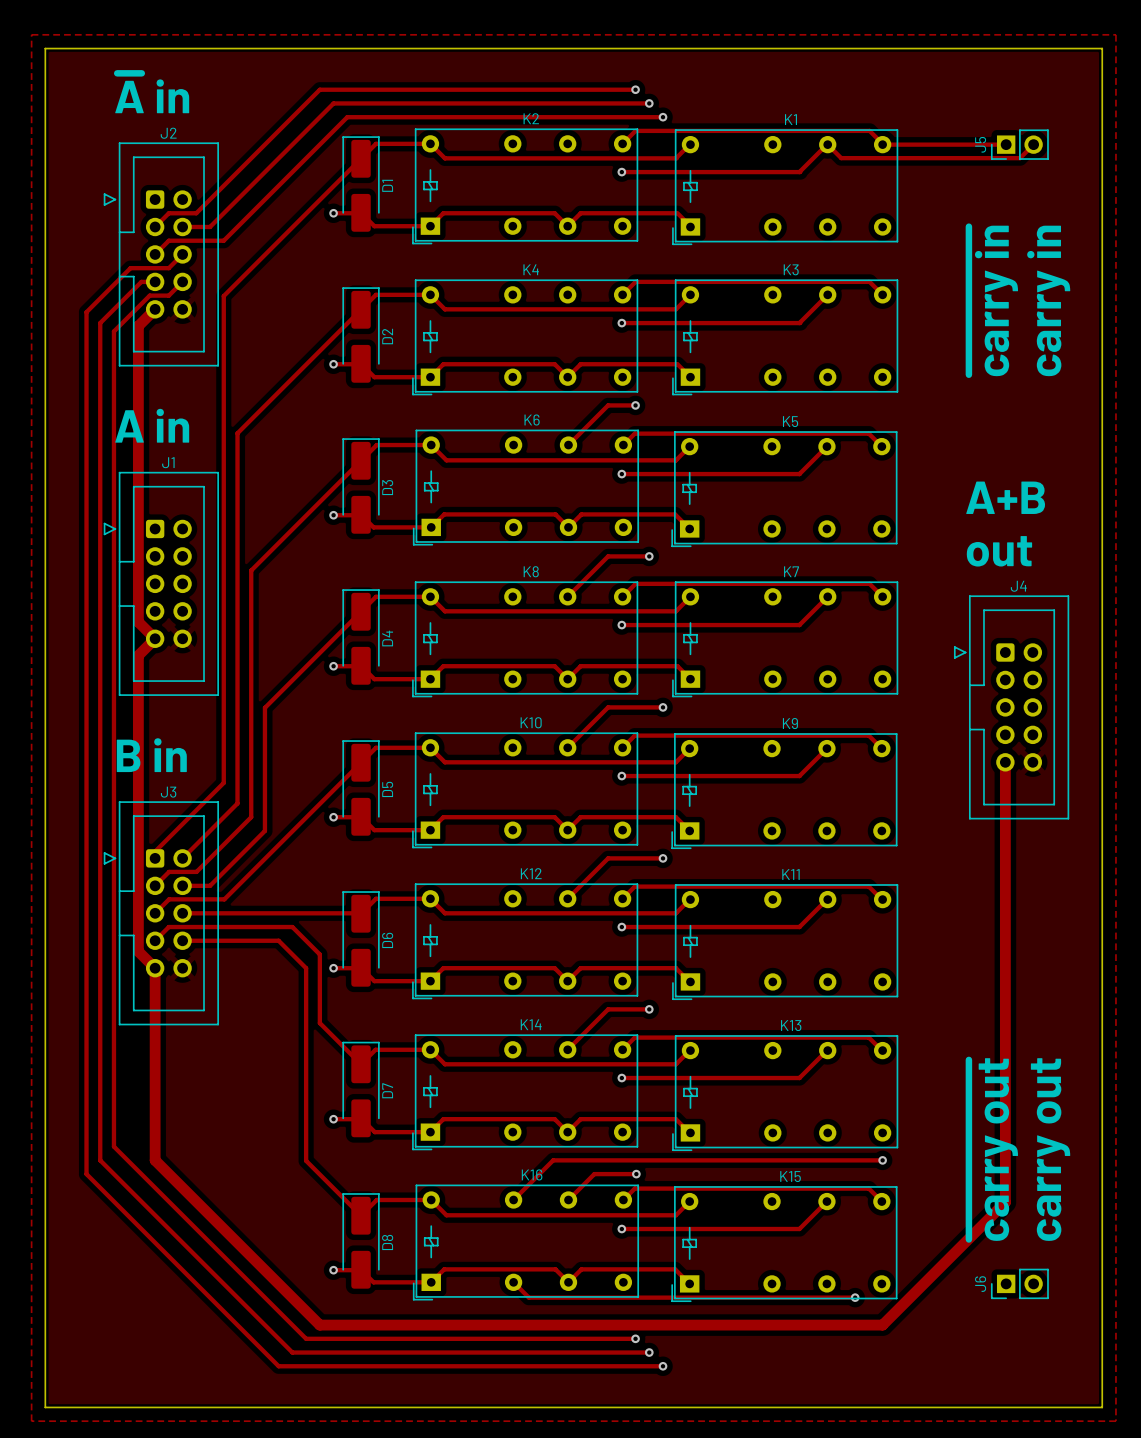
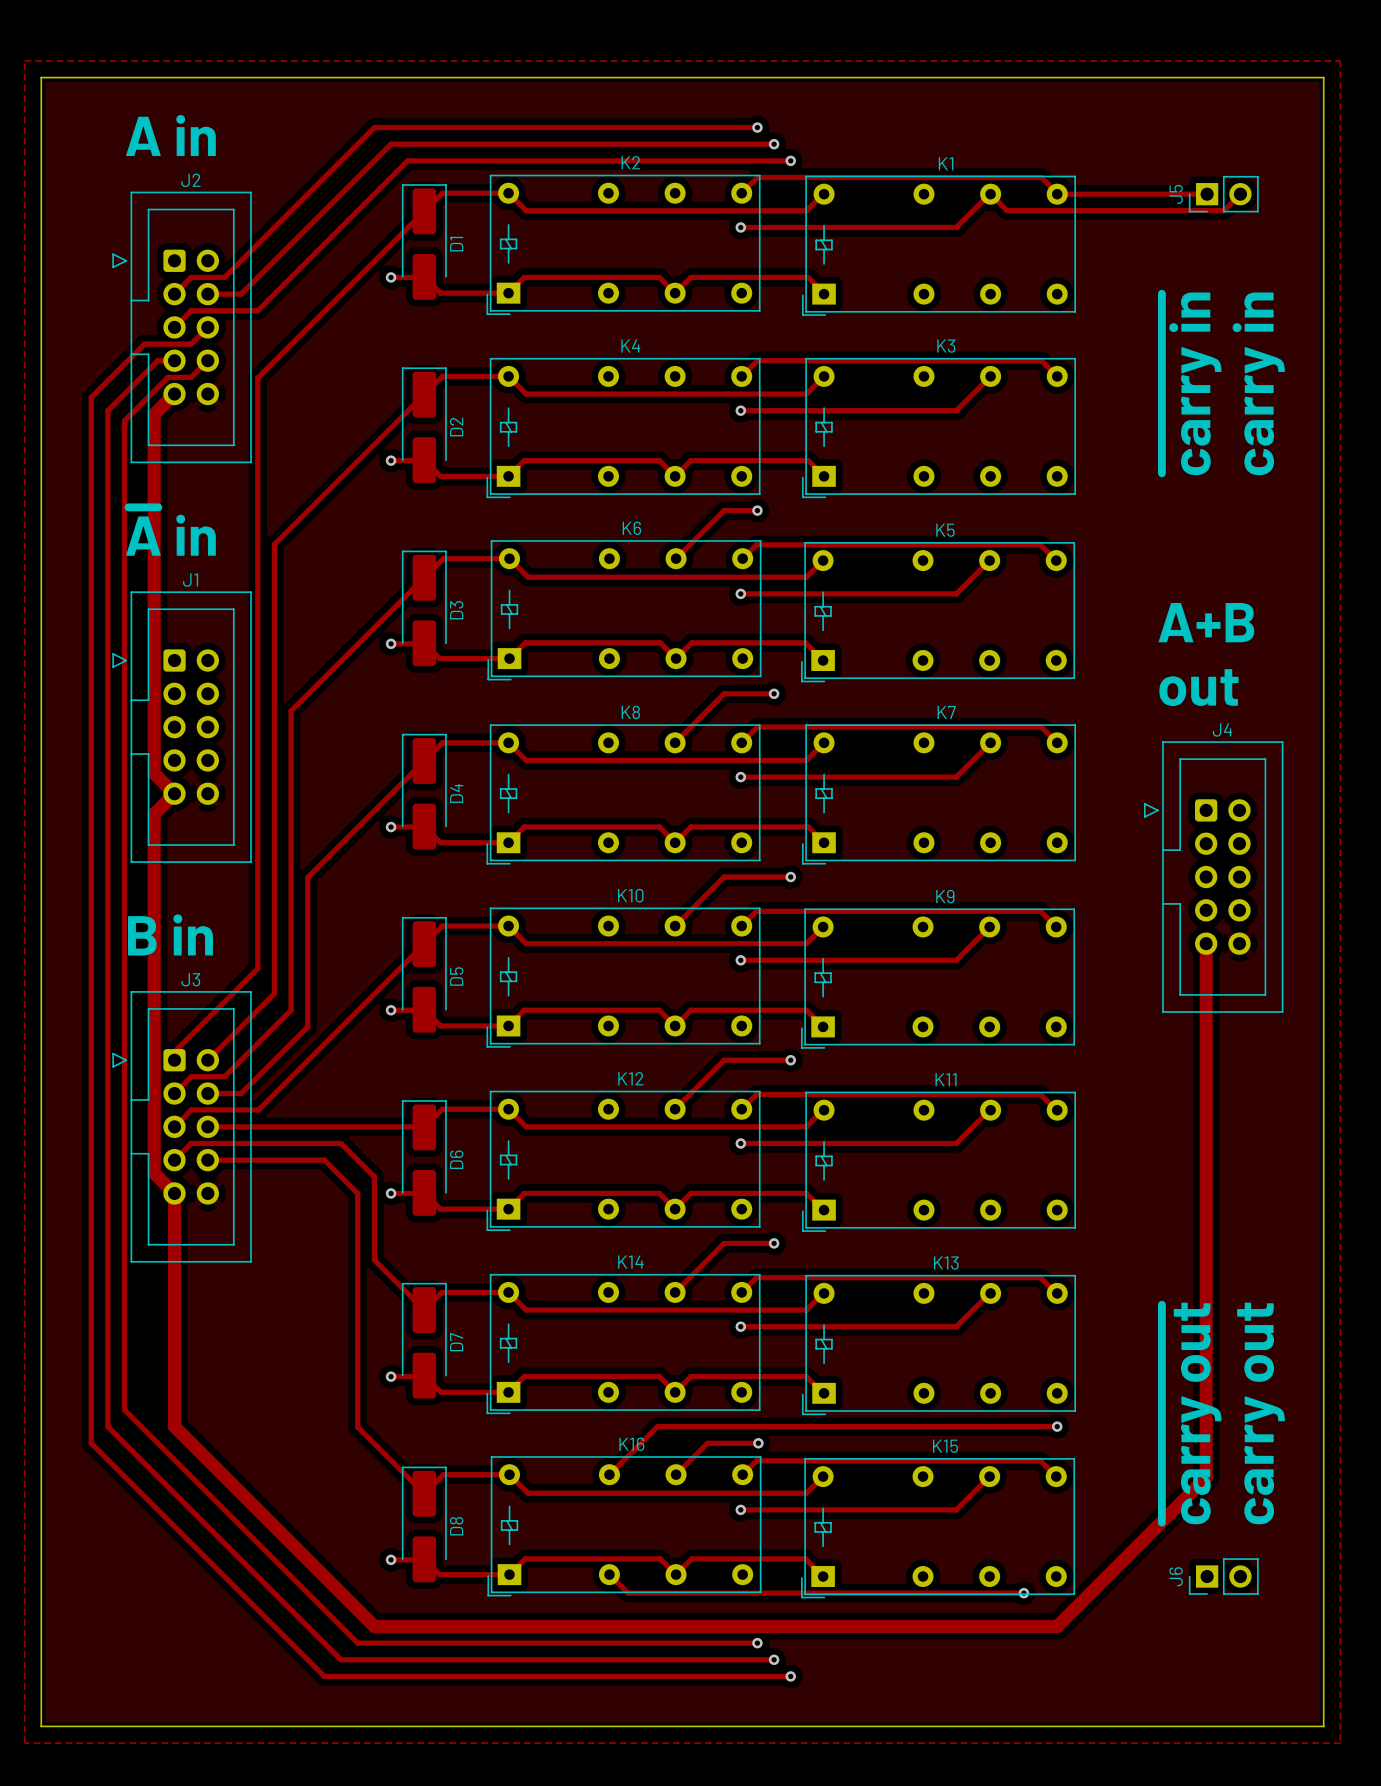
text: ~{A} in (152, 93) -> A in (170, 135)
text: A in (152, 425) -> ~{A} in (170, 531)

